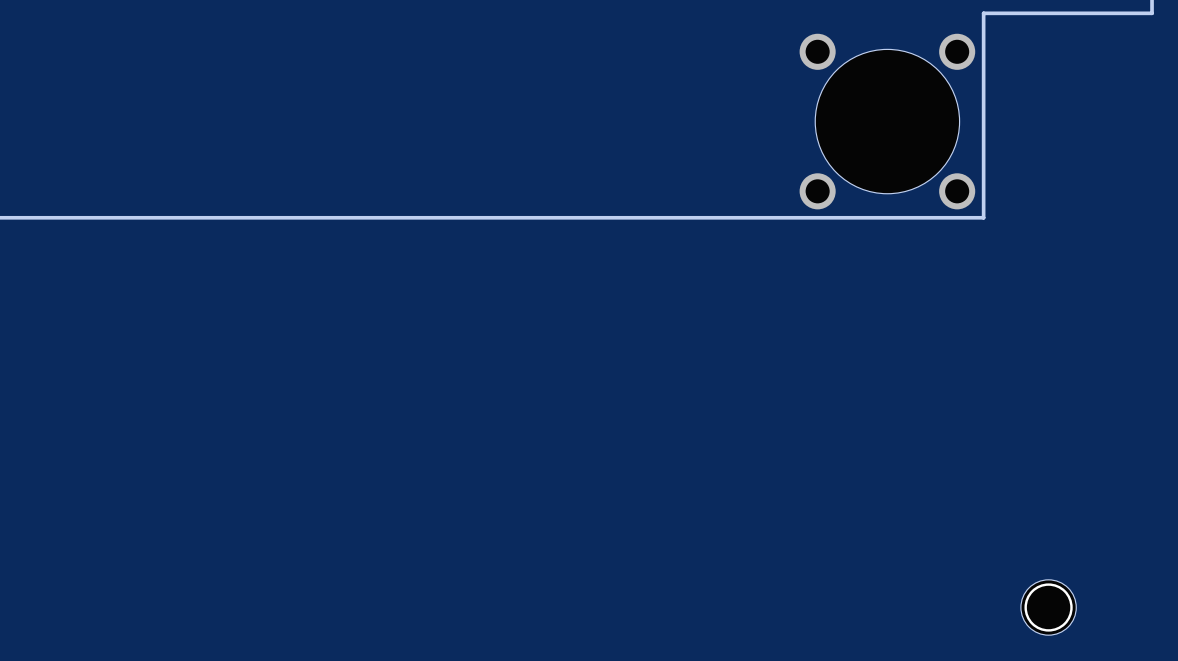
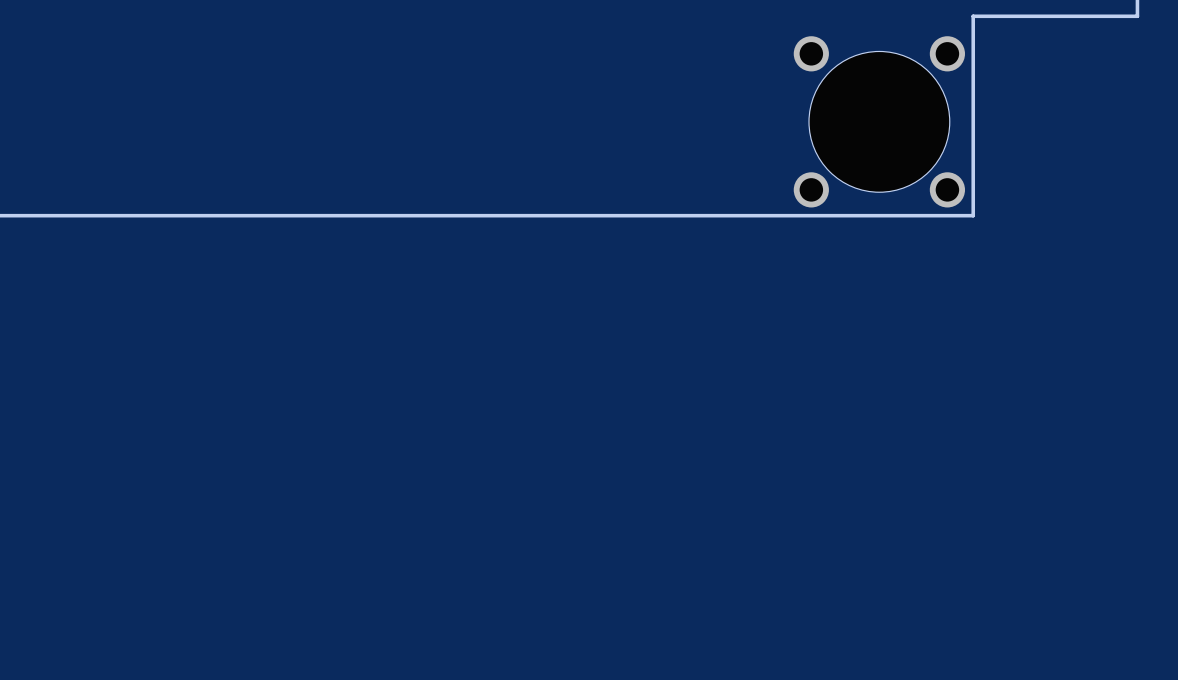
part: (1048, 607) -> none

